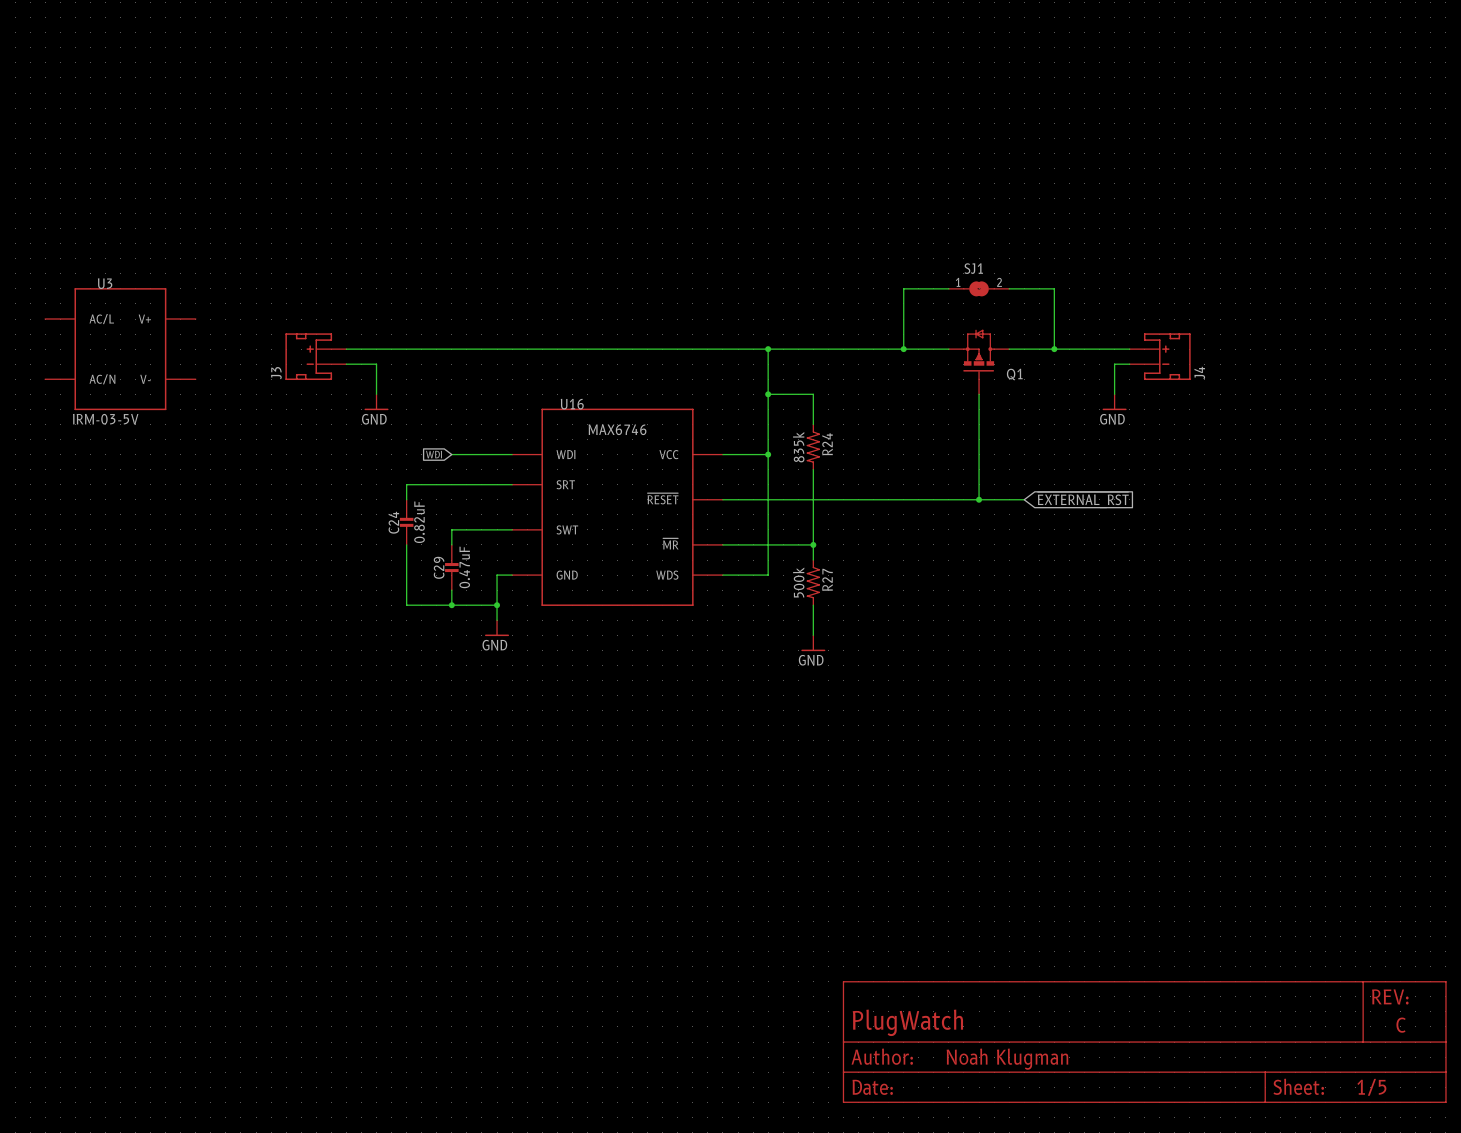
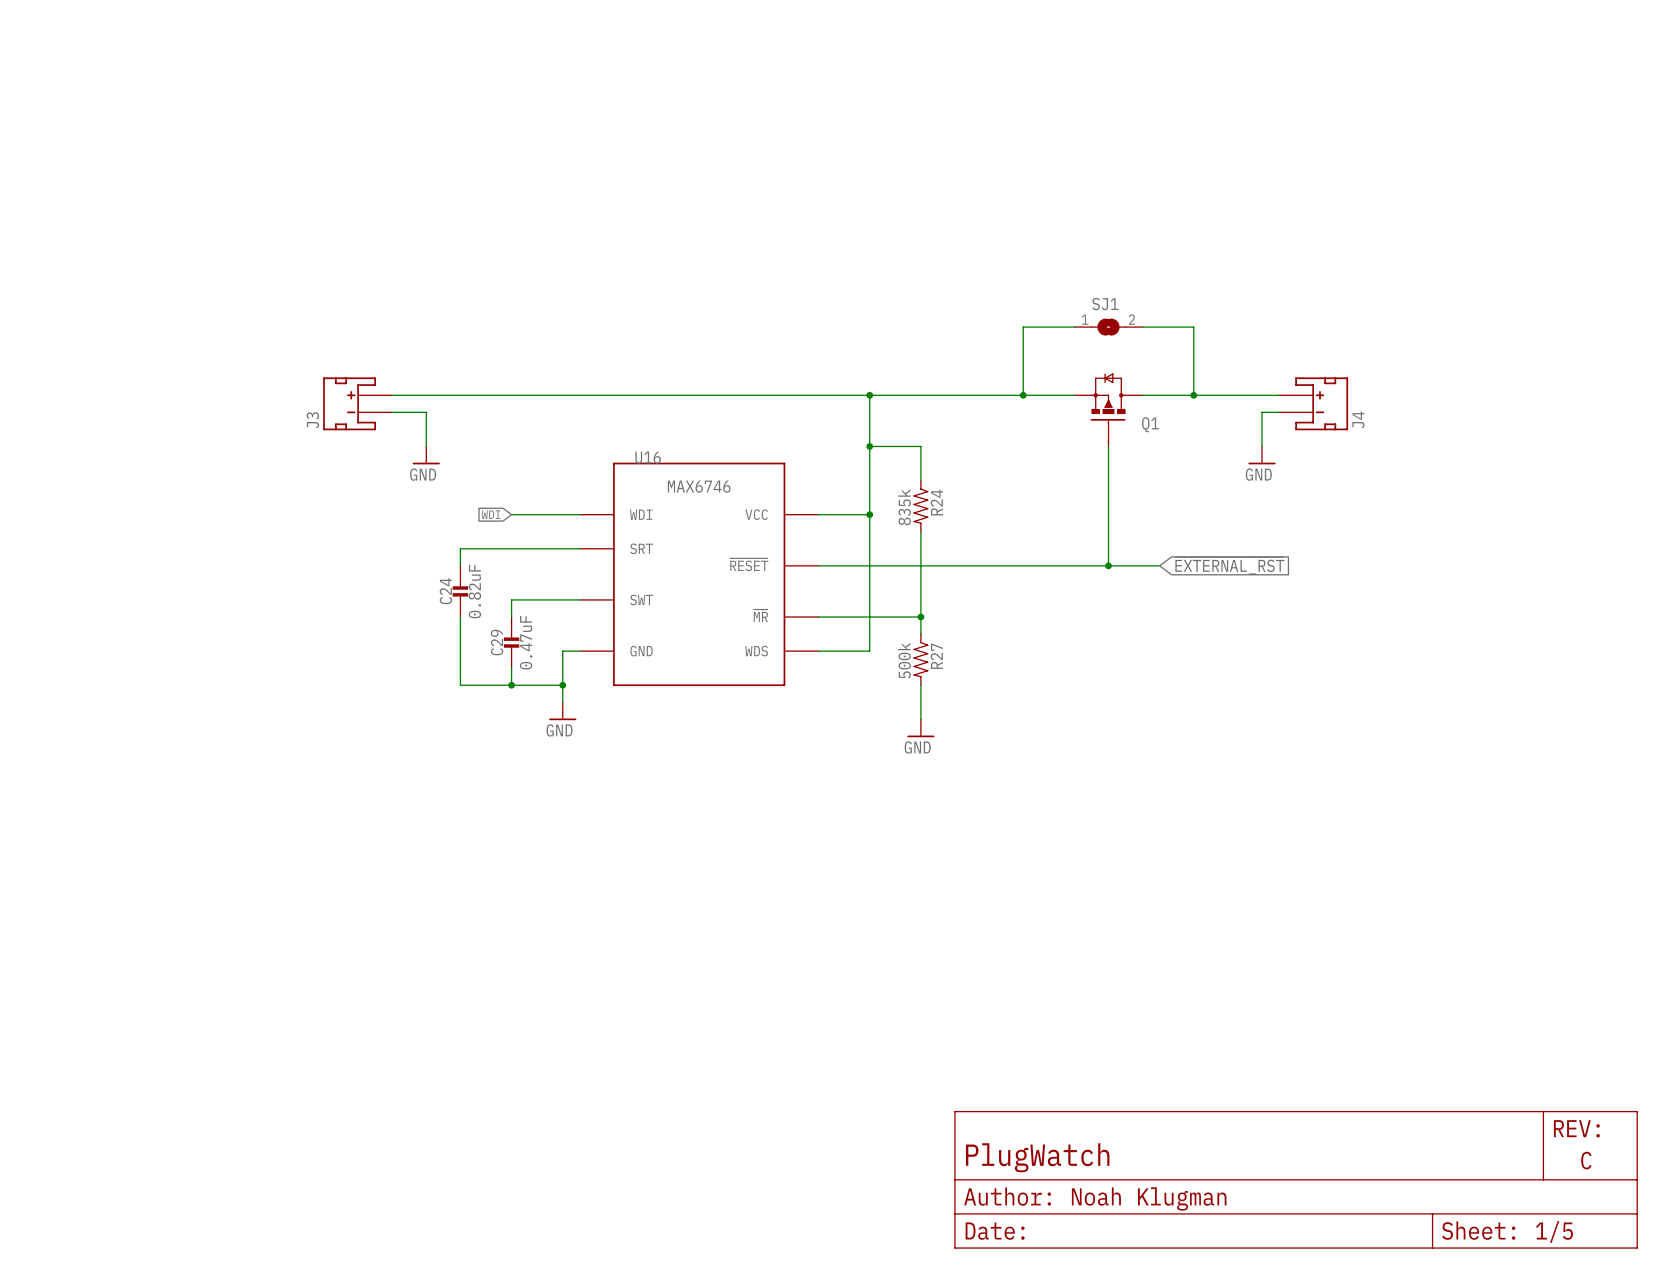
U3: IRM-03-5V (120, 349) -> none

